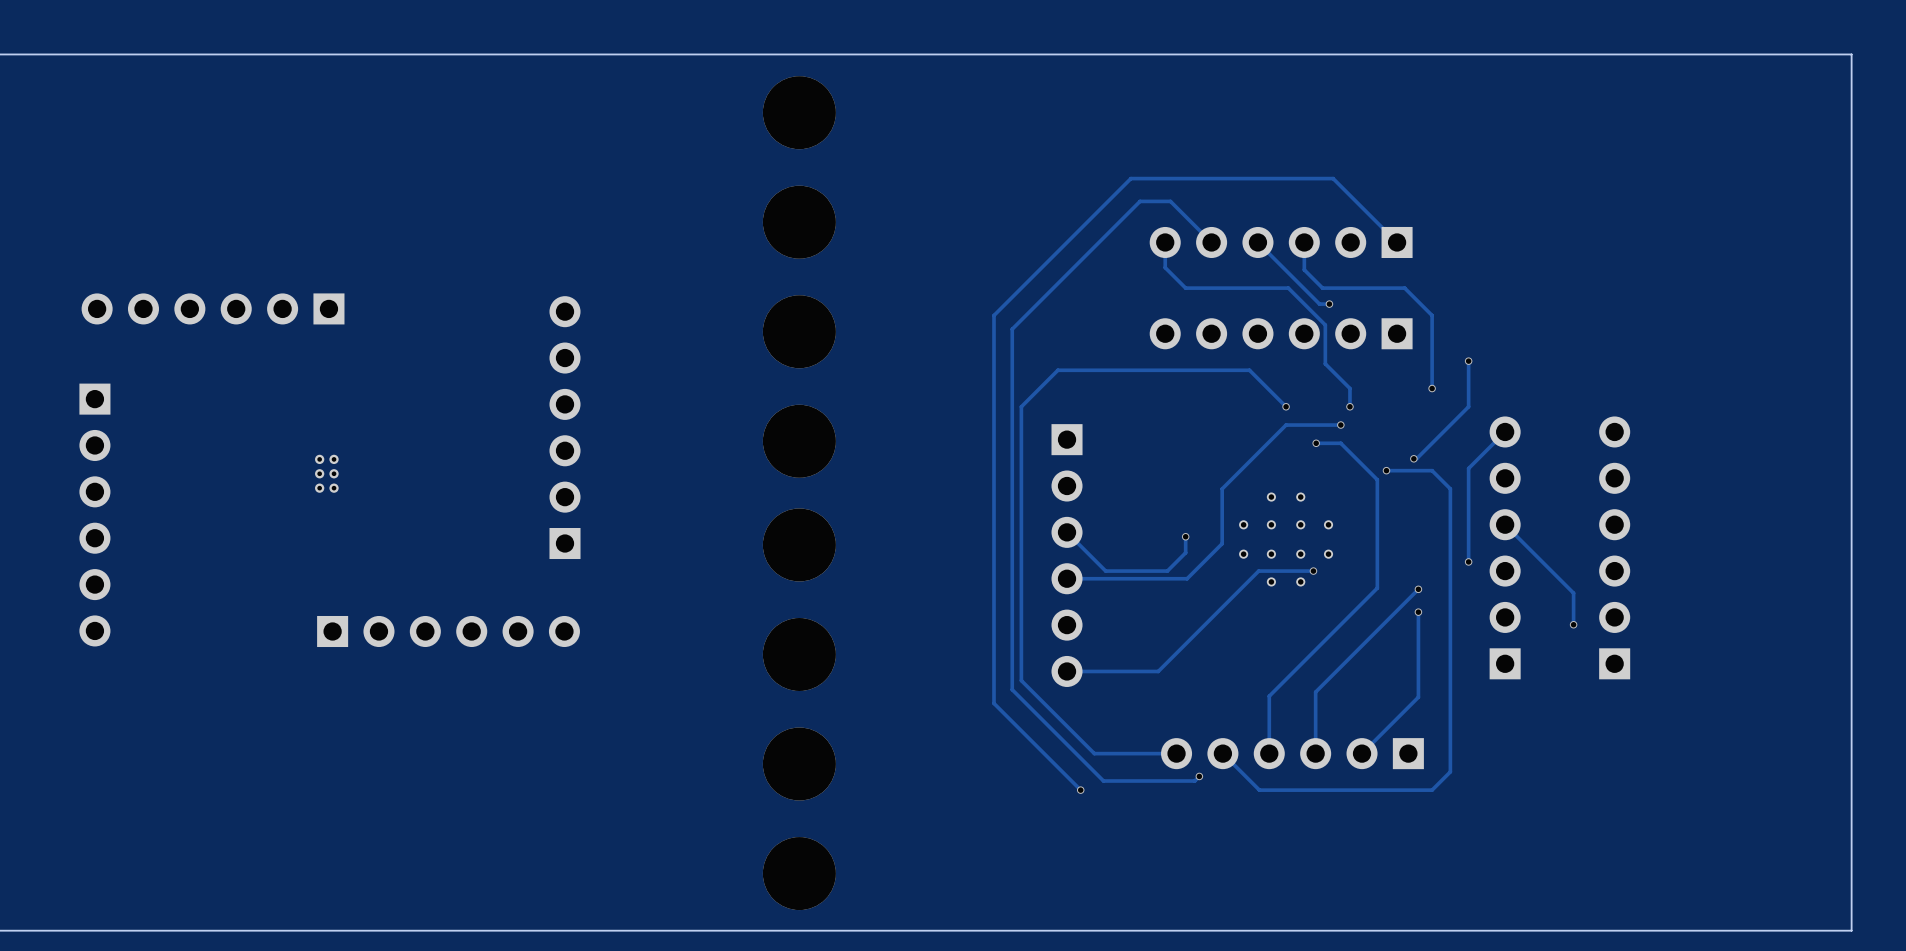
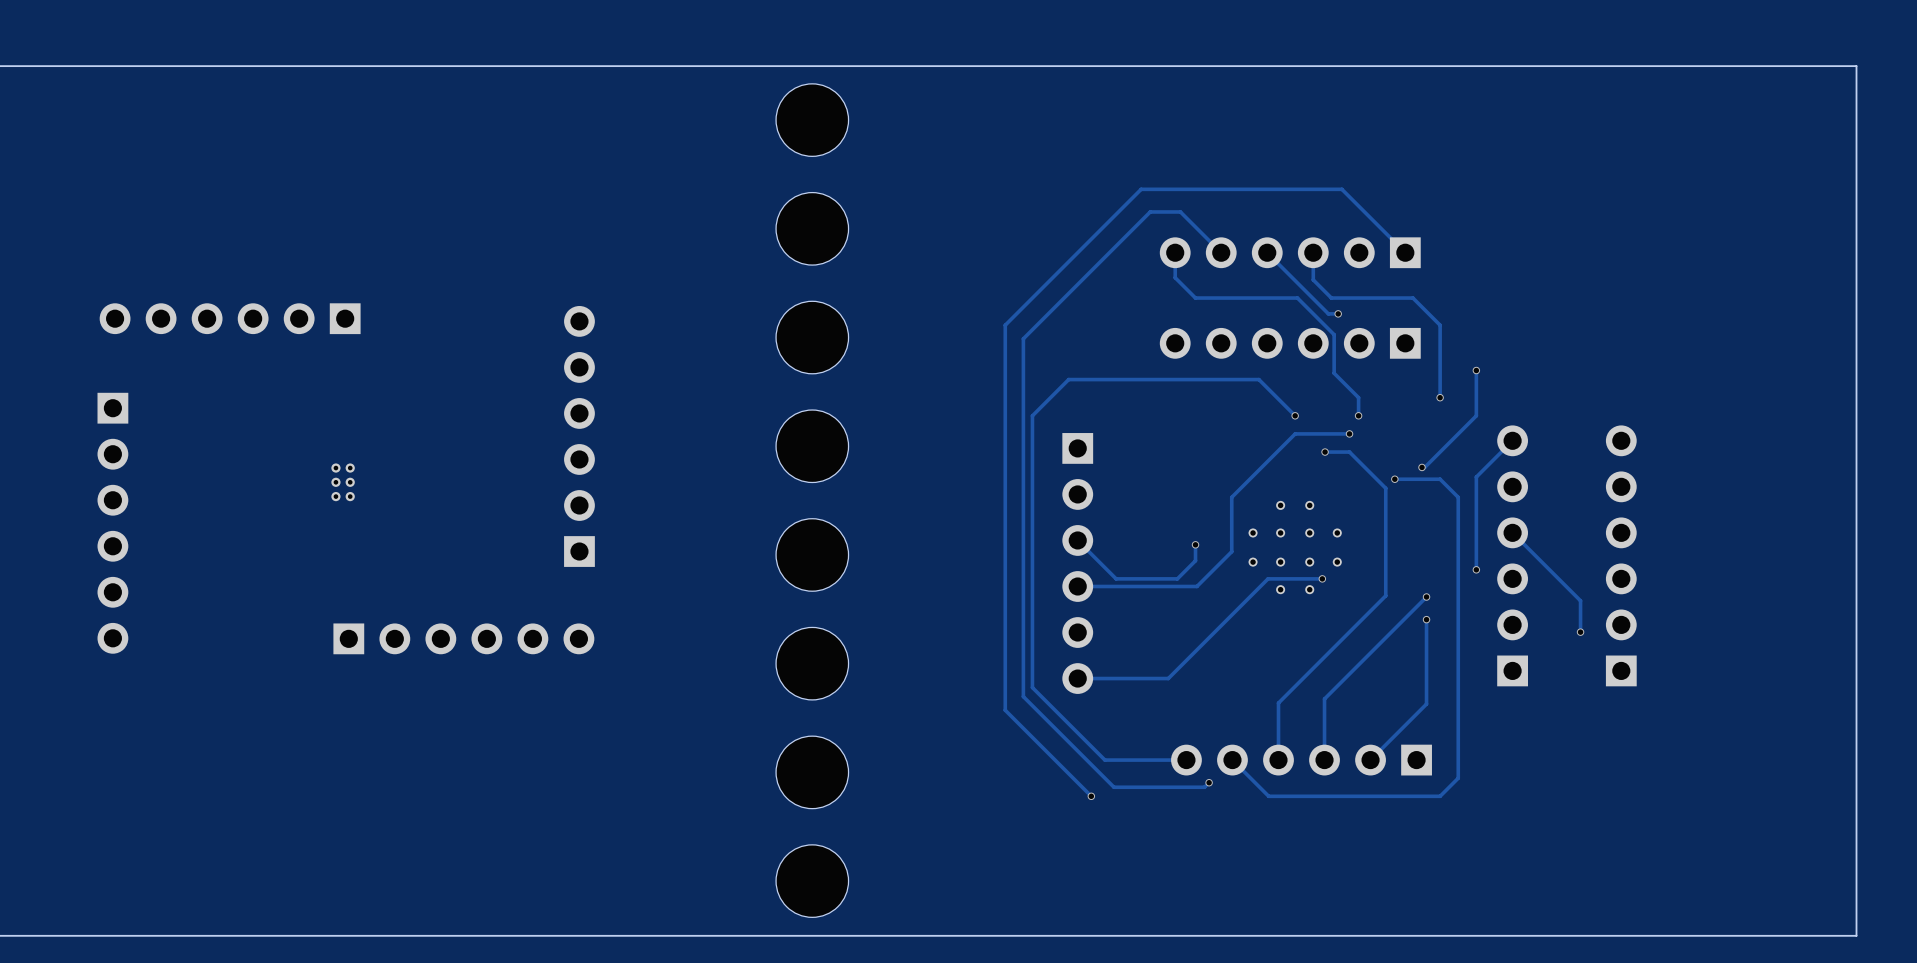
part footprint: [762, 76, 836, 150] -> [776, 83, 849, 157]
part footprint: [762, 185, 836, 259] -> [776, 192, 849, 266]
part footprint: [762, 295, 836, 369] -> [776, 301, 849, 374]
part footprint: [762, 404, 836, 478] -> [776, 410, 849, 483]
part footprint: [762, 508, 836, 582] -> [776, 518, 849, 592]
part footprint: [762, 617, 836, 692] -> [776, 627, 849, 700]
part footprint: [762, 727, 836, 801] -> [776, 736, 849, 809]
part footprint: [762, 837, 836, 911] -> [776, 844, 849, 918]

